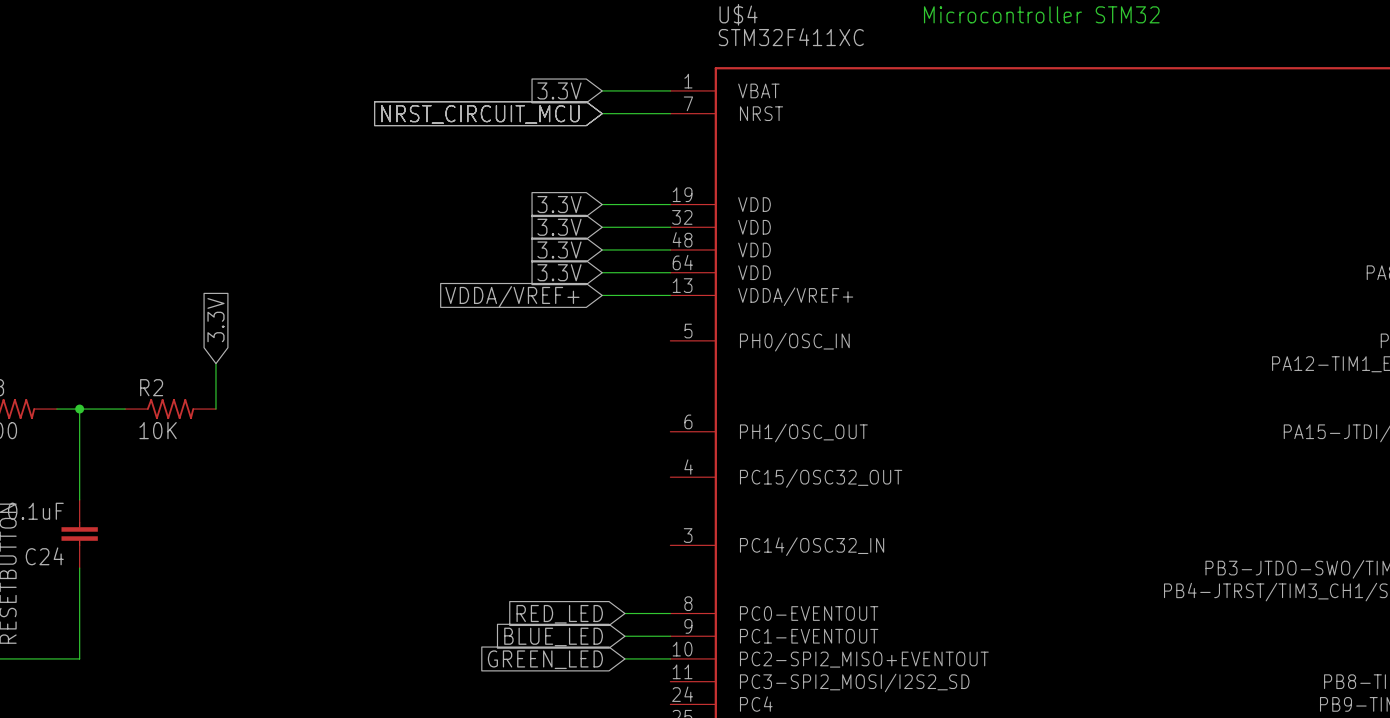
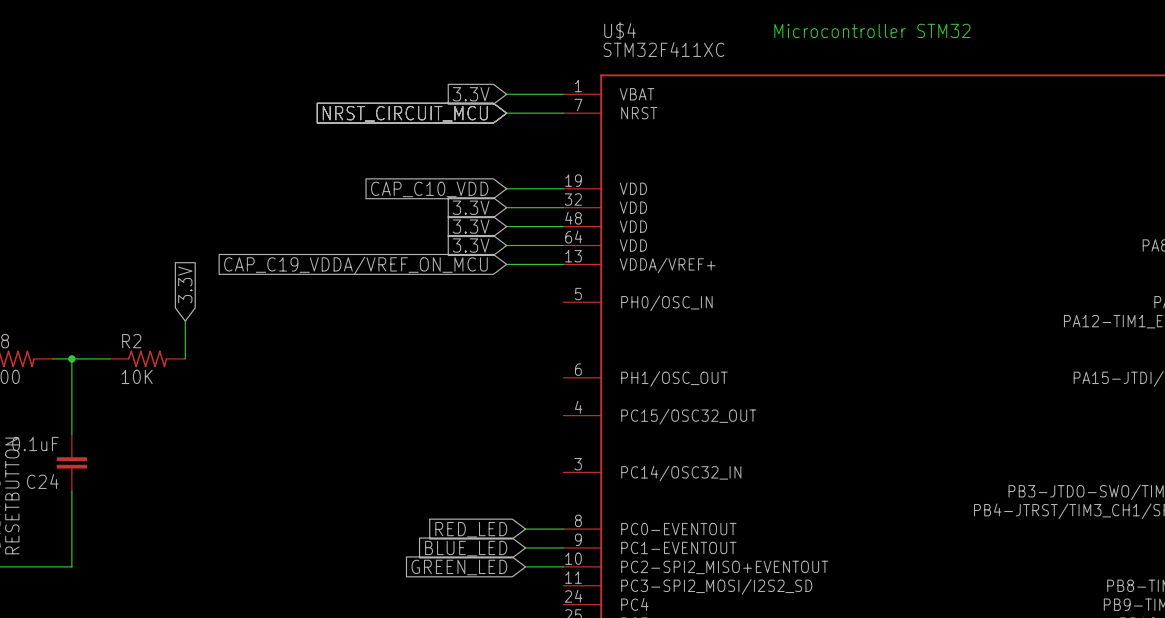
global label: 3.3V (559, 204) -> CAP_C10_VDD (429, 189)
global label: VDDA/VREF+ (512, 296) -> CAP_C19_VDDA/VREF_ON_MCU (355, 265)

